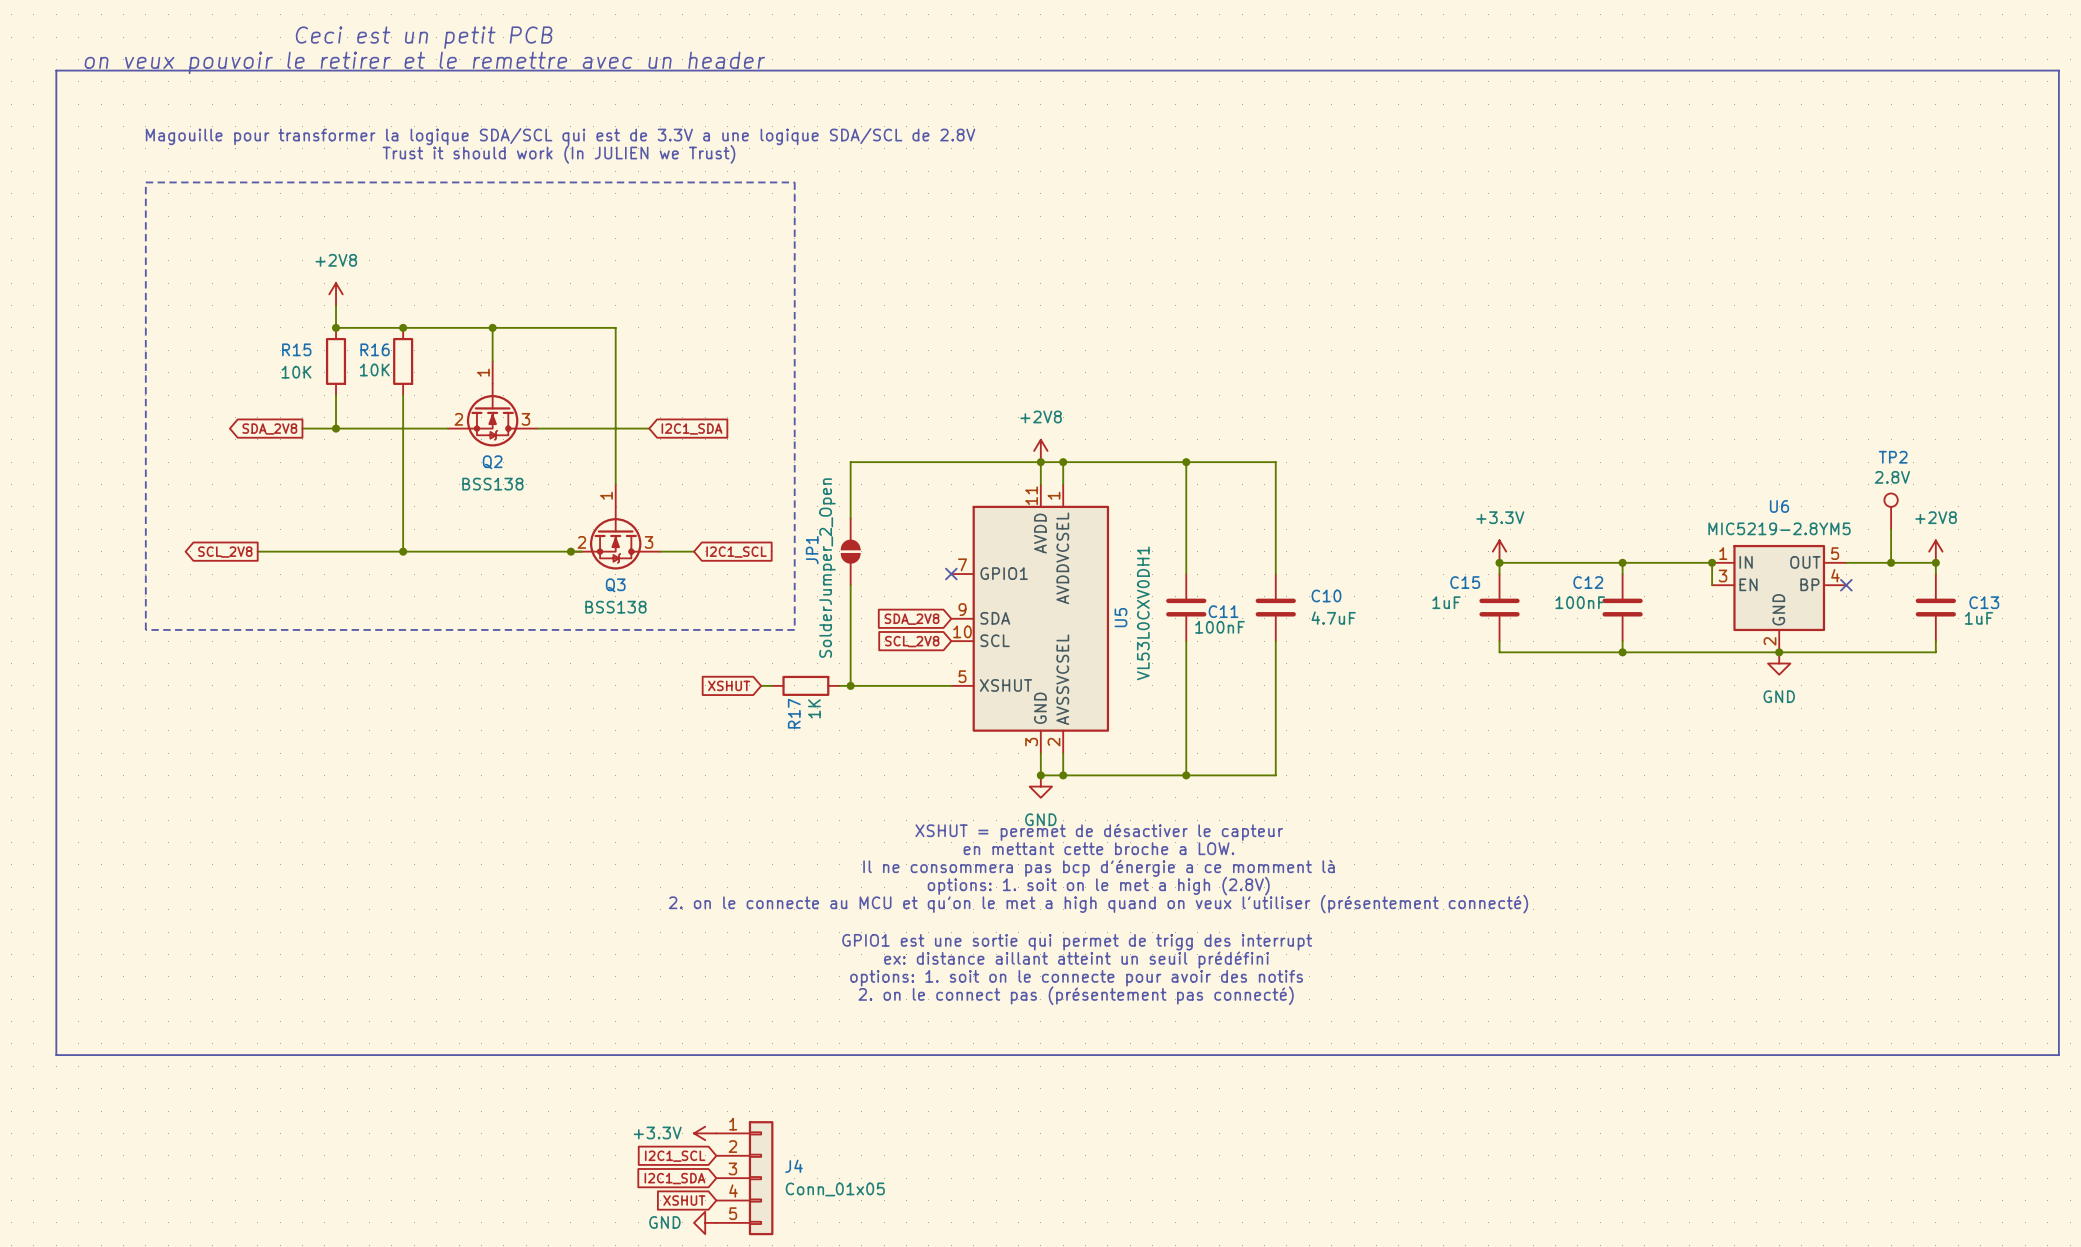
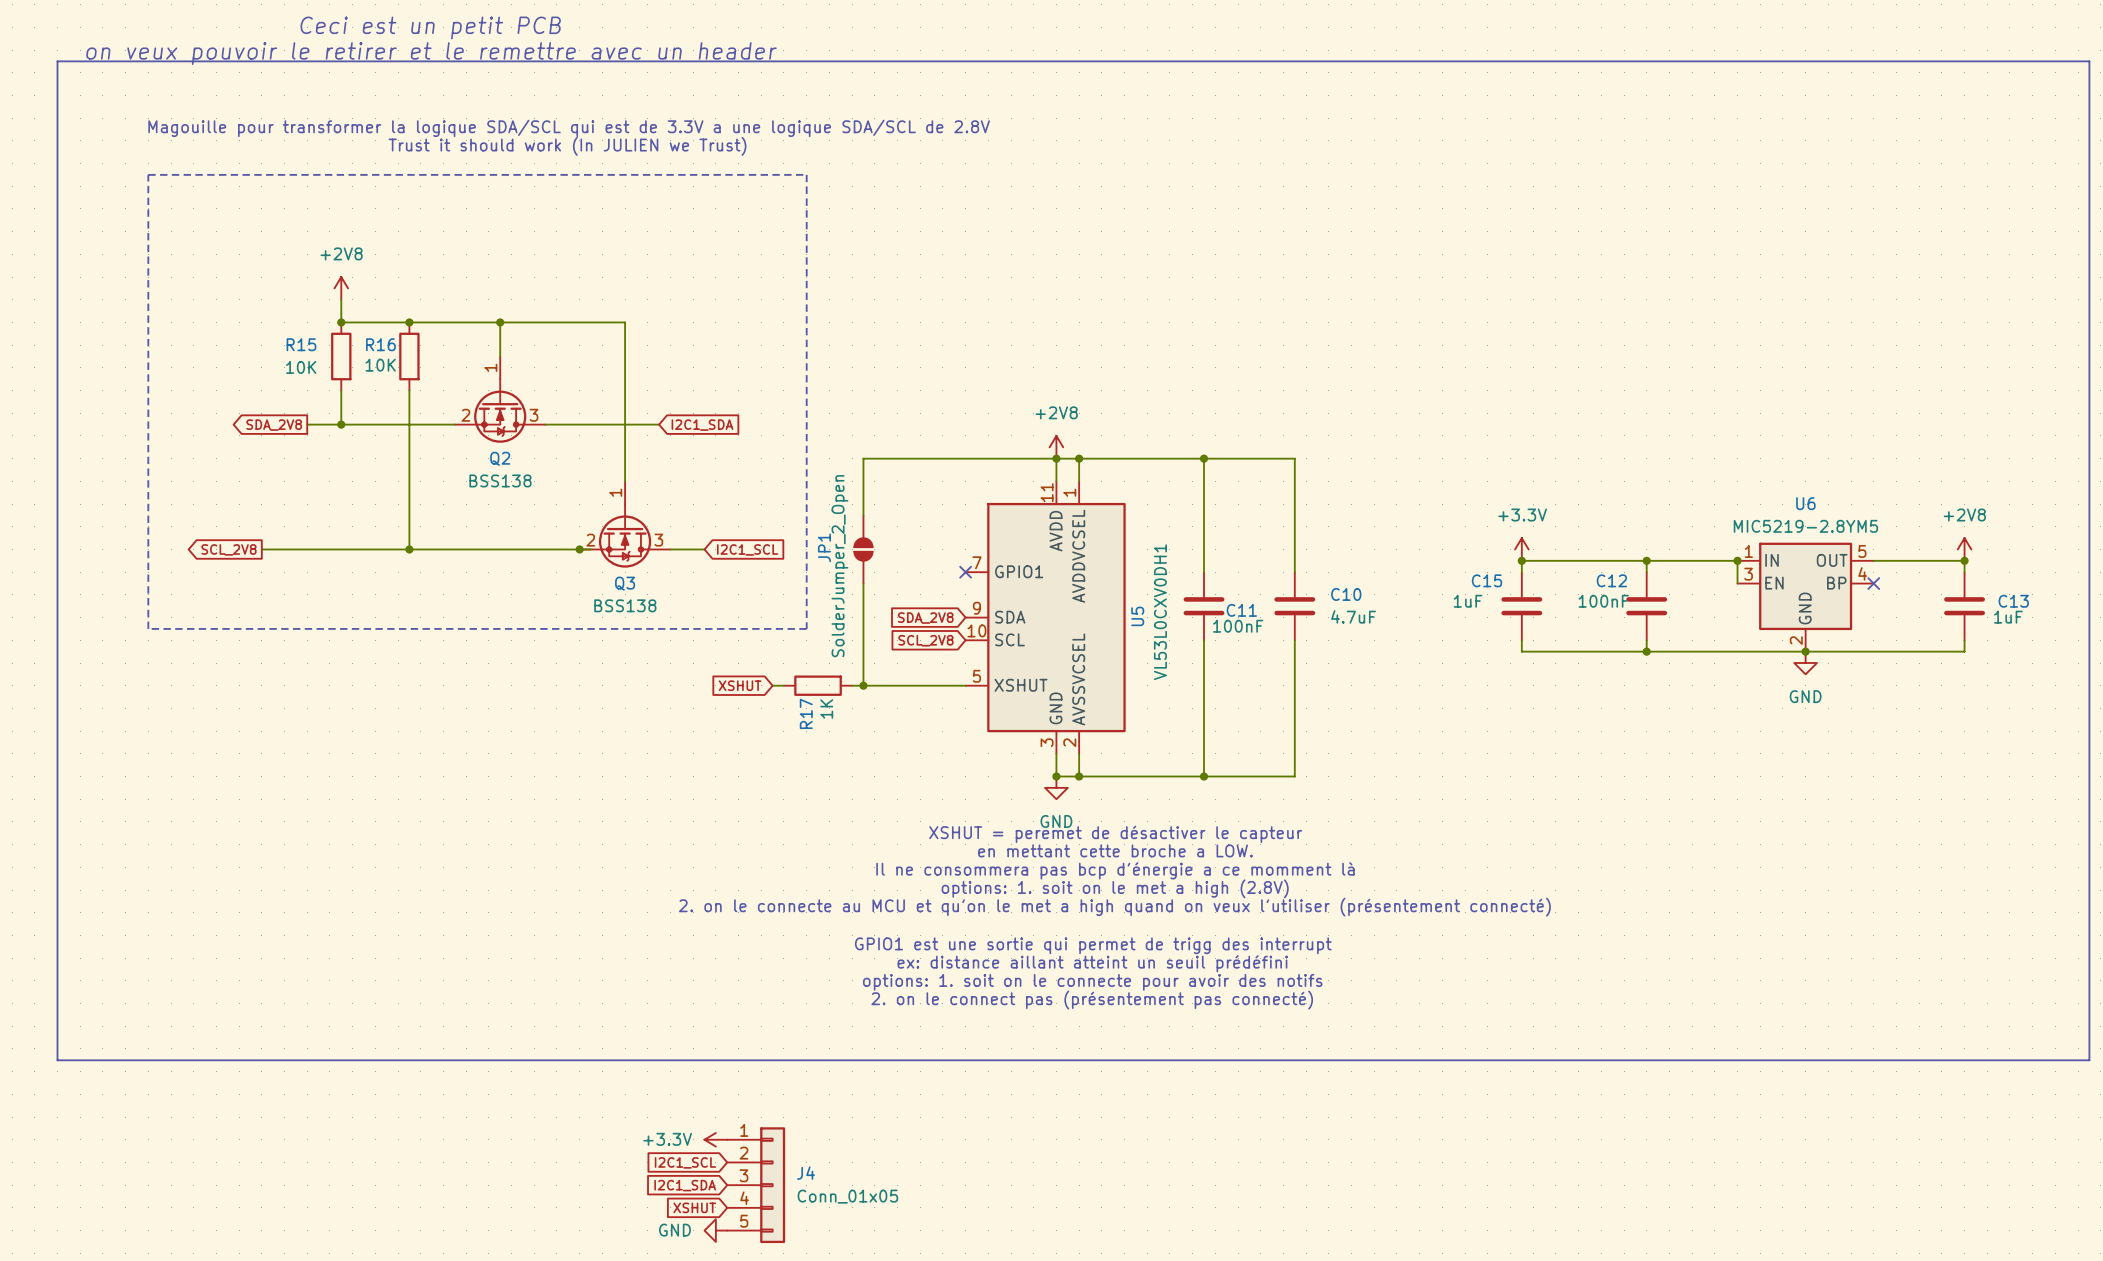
TP2: 2.8V (1891, 511) -> none
wire: (1891, 529) (1891, 562) -> none
junction: (1891, 562) -> none

